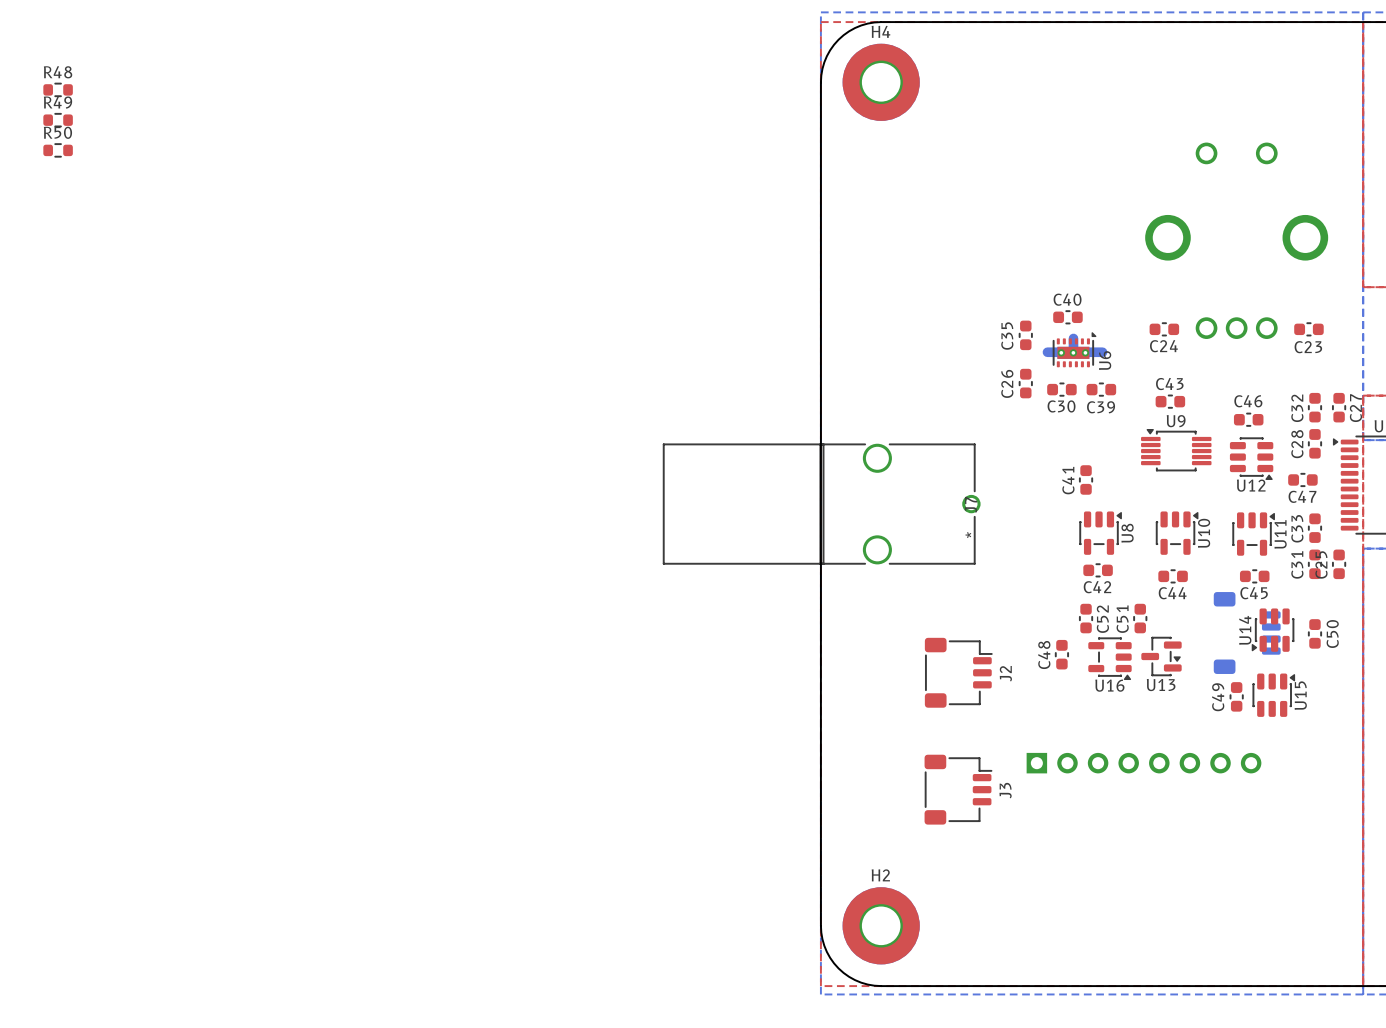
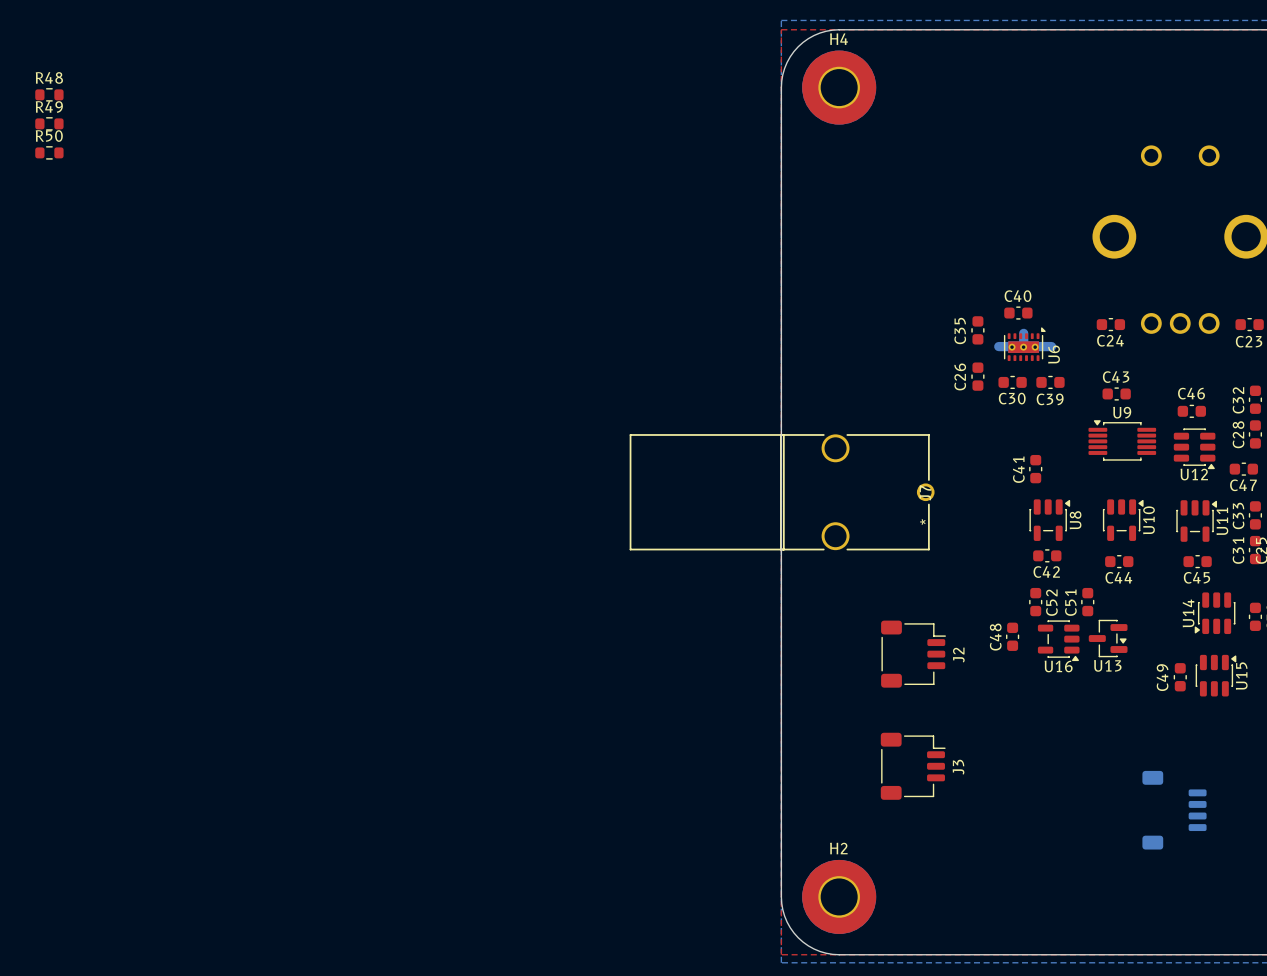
part position: (1247, 633) -> (1174, 810)
part: (1143, 763) -> none

